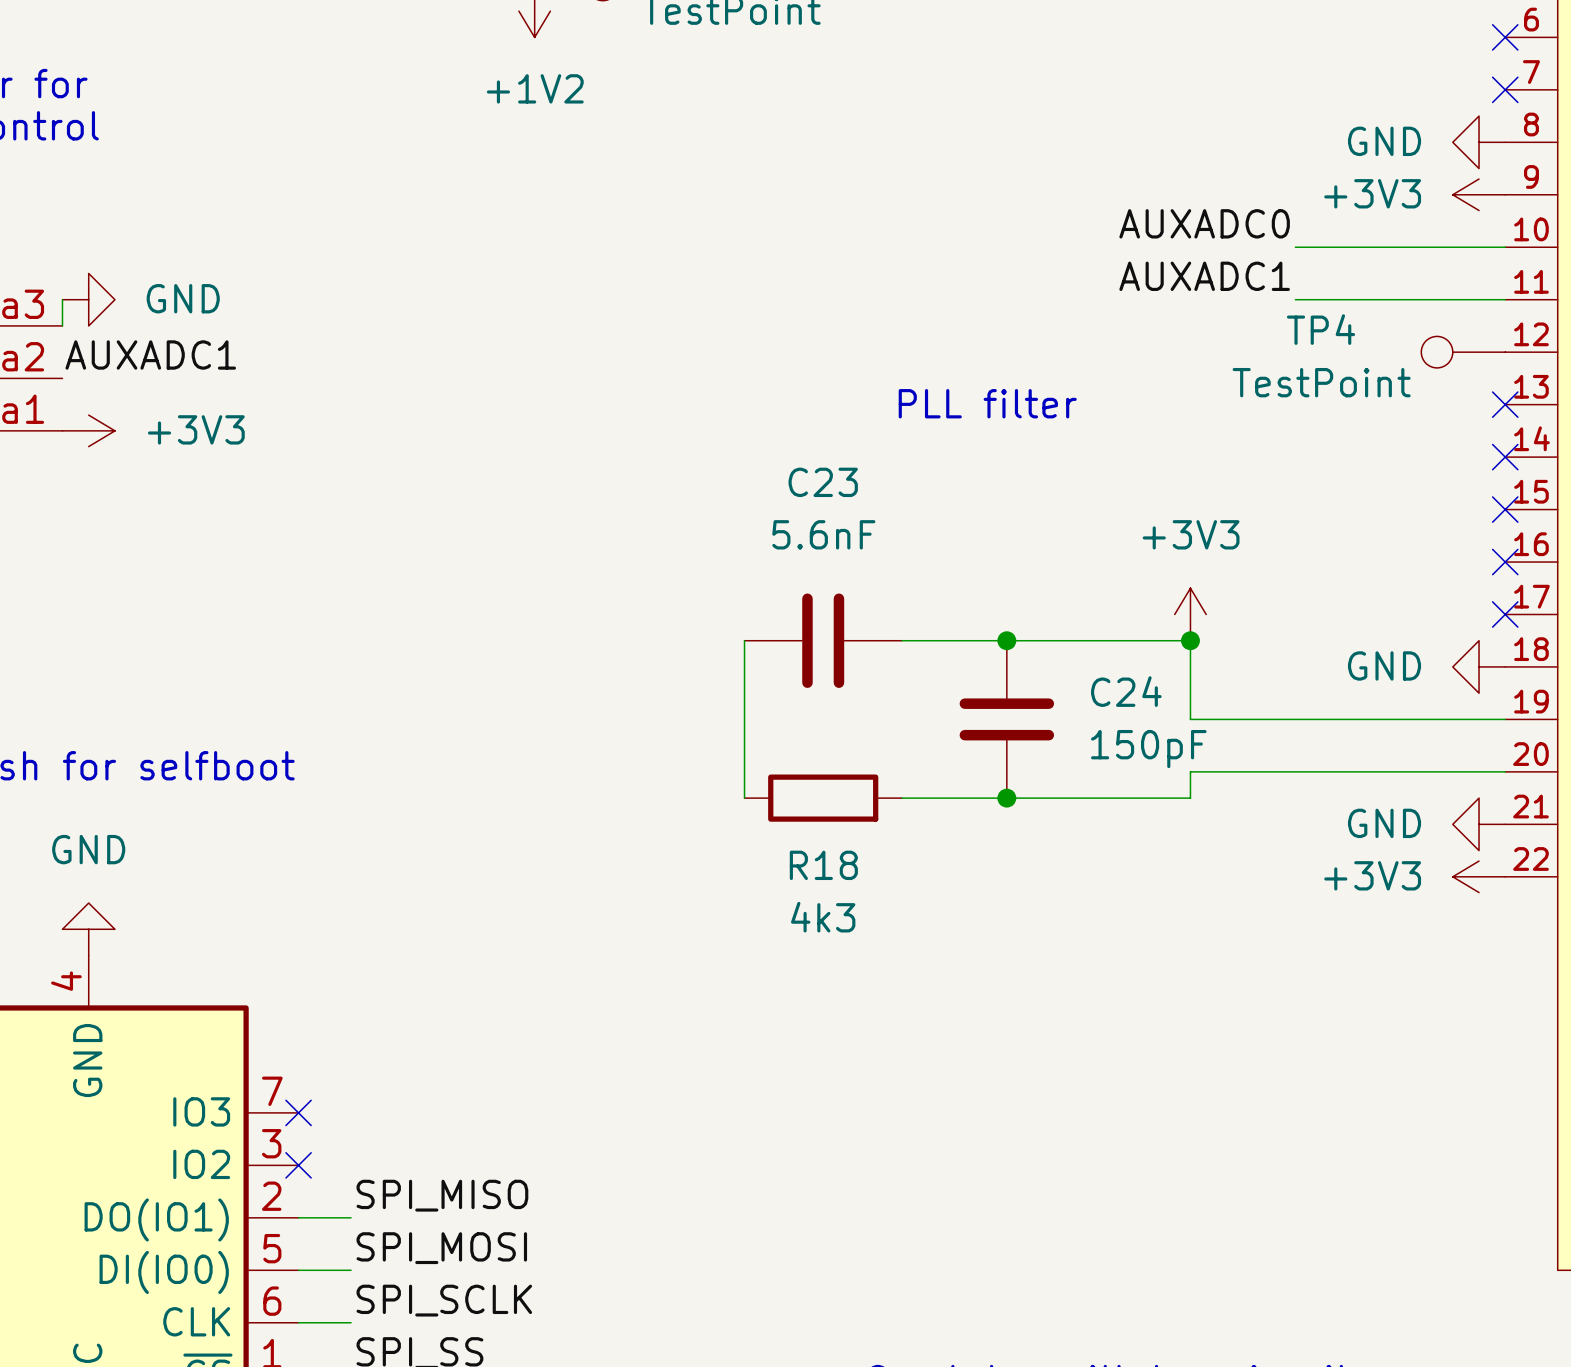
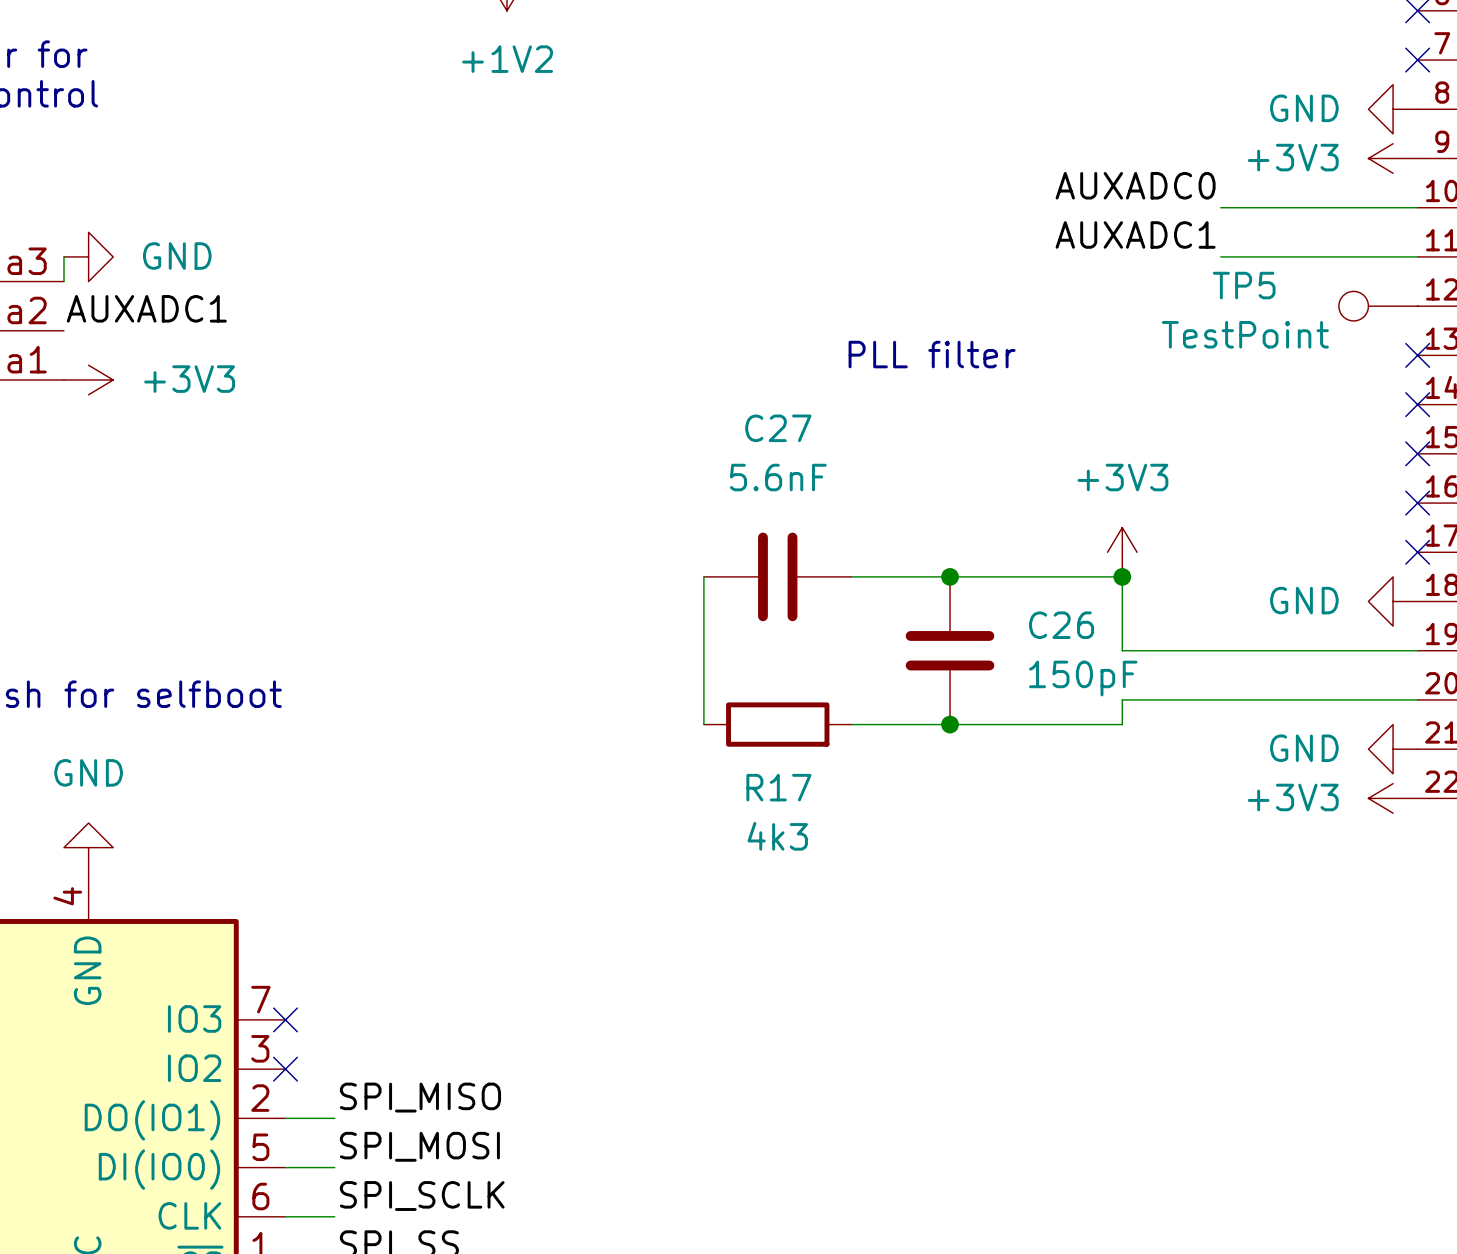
TP4 name: TP4 (1321, 329) -> TP5 (1244, 285)
C23 name: C23 (823, 482) -> C27 (778, 428)
C24 name: C24 (1126, 691) -> C26 (1061, 625)
R18 name: R18 (823, 865) -> R17 (778, 787)

